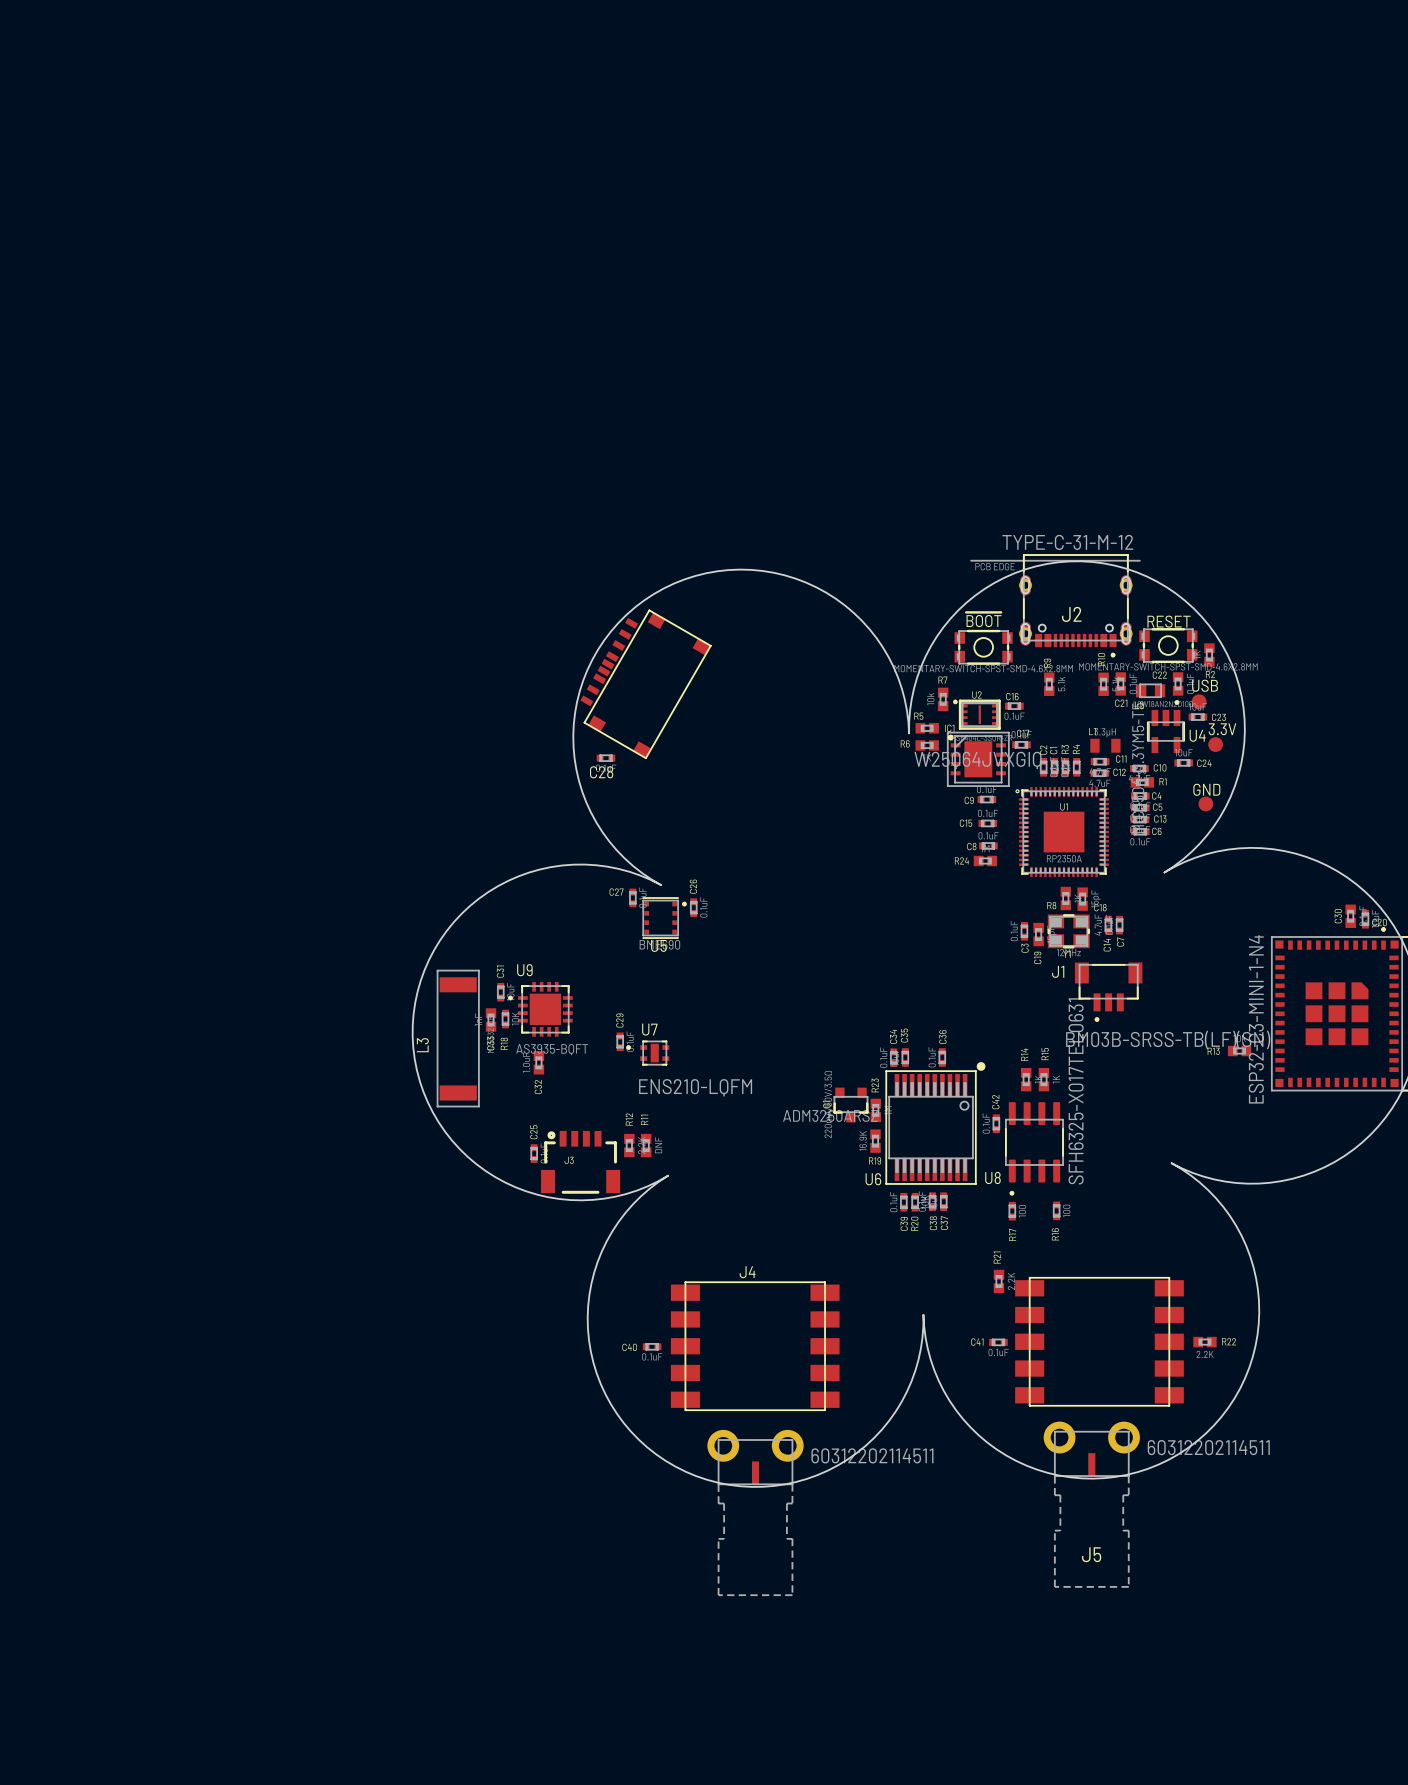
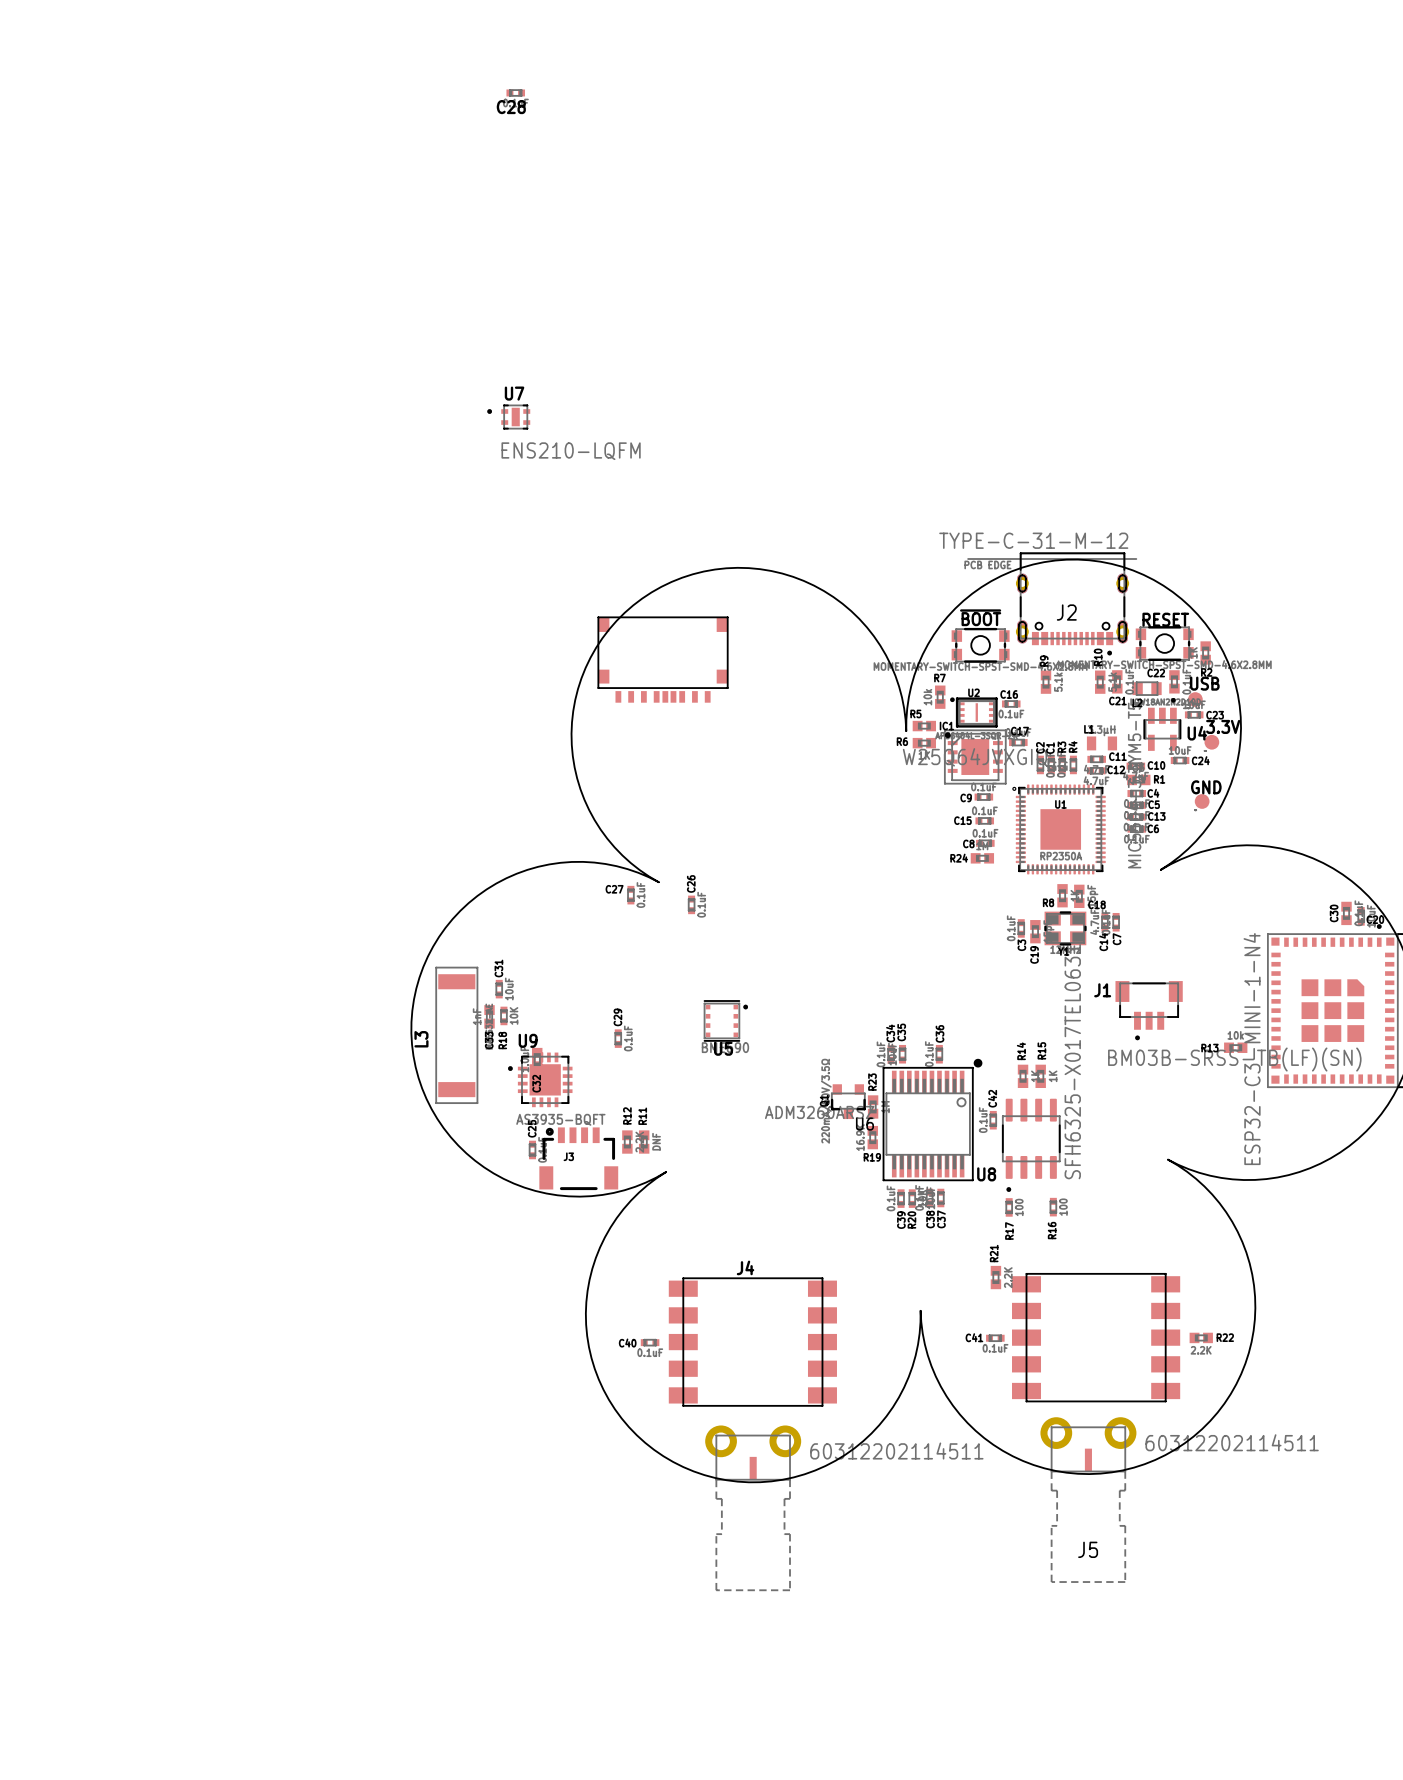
part: none -> (663, 659)
part: (645, 684) -> none
C28 position: (605, 758) -> (515, 92)
U5 position: (664, 918) -> (725, 1020)
J1 position: (1108, 992) -> (1149, 1010)
U9 position: (540, 1009) -> (540, 1079)
U7 position: (647, 1053) -> (508, 417)
U6 name position: U6 (873, 1179) -> U6 (864, 1124)

